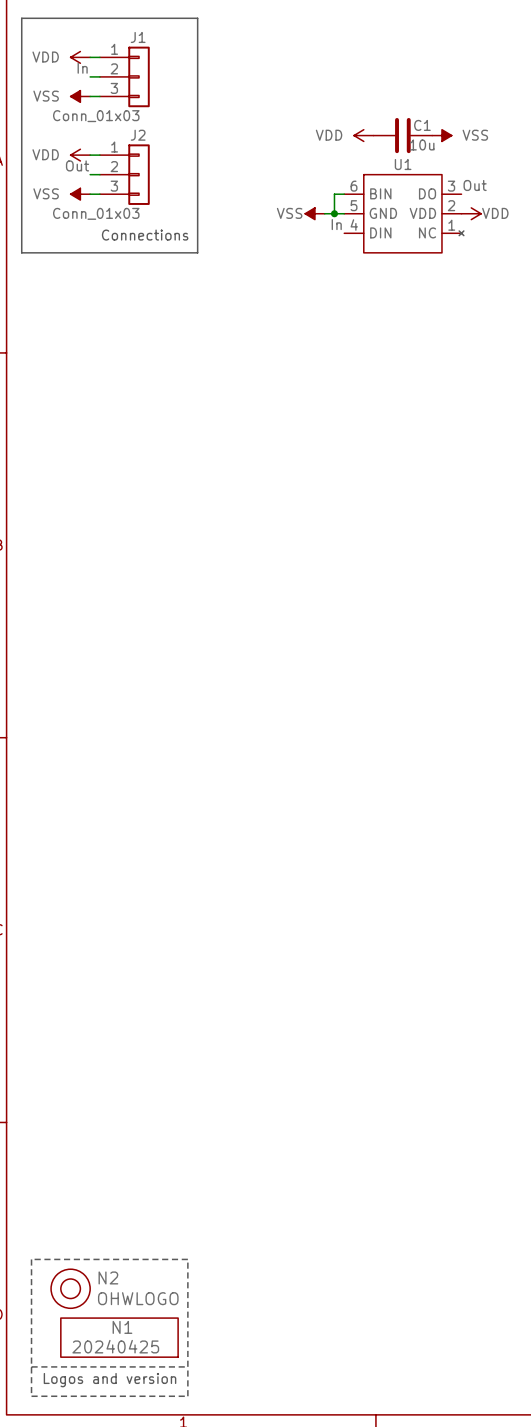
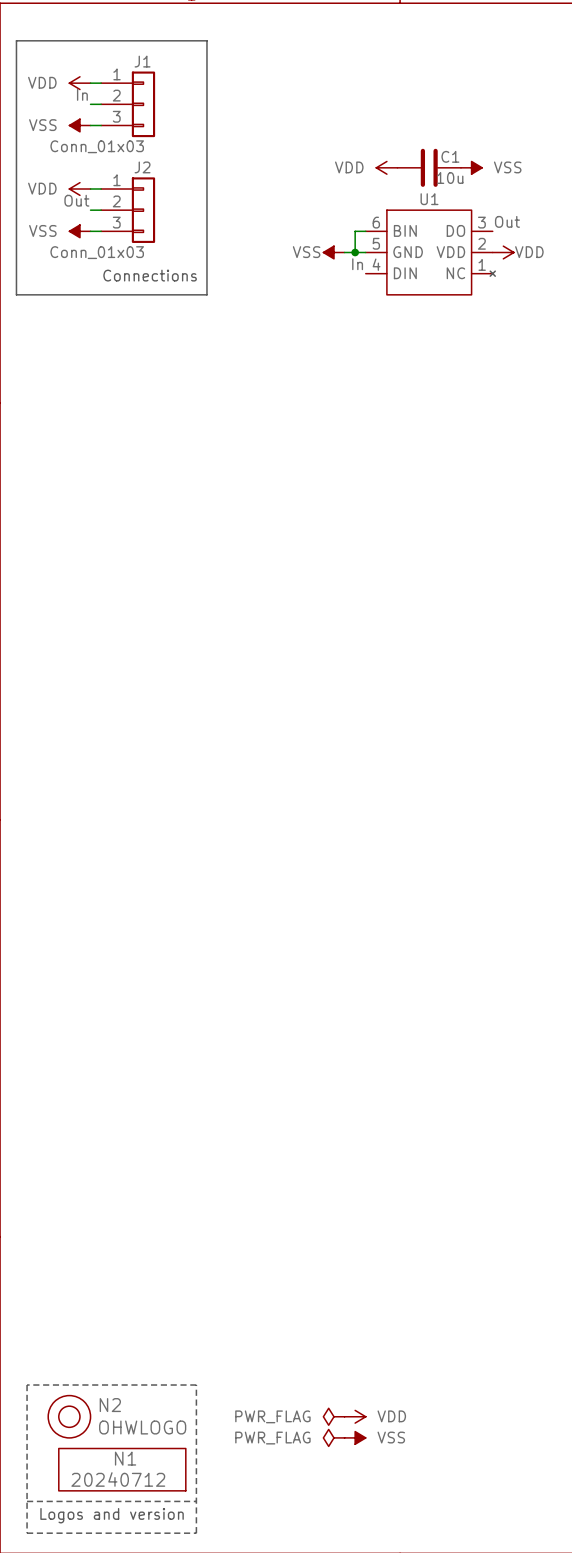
power symbol: none -> PWR_FLAG (333, 1416)
power symbol: none -> VDD (355, 1416)
power symbol: none -> PWR_FLAG (333, 1437)
power symbol: none -> VSS (355, 1437)
N1 value: 20240425 (115, 1346) -> 20240712 (118, 1479)

